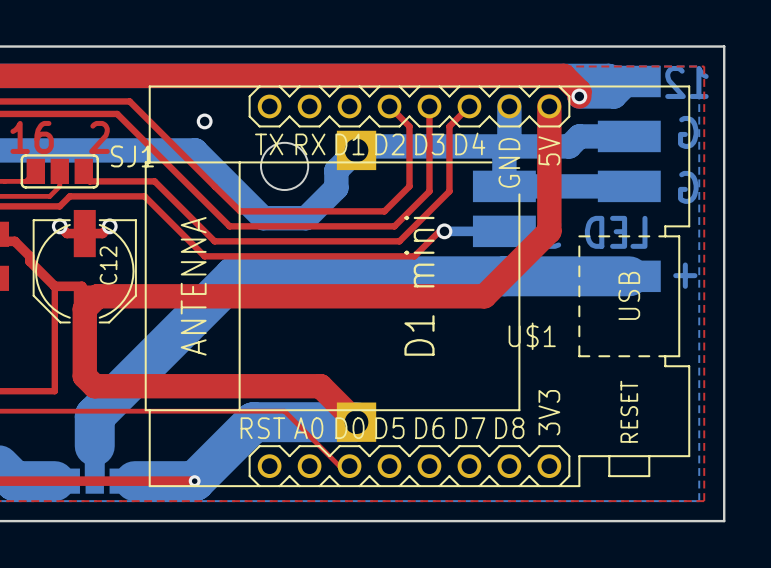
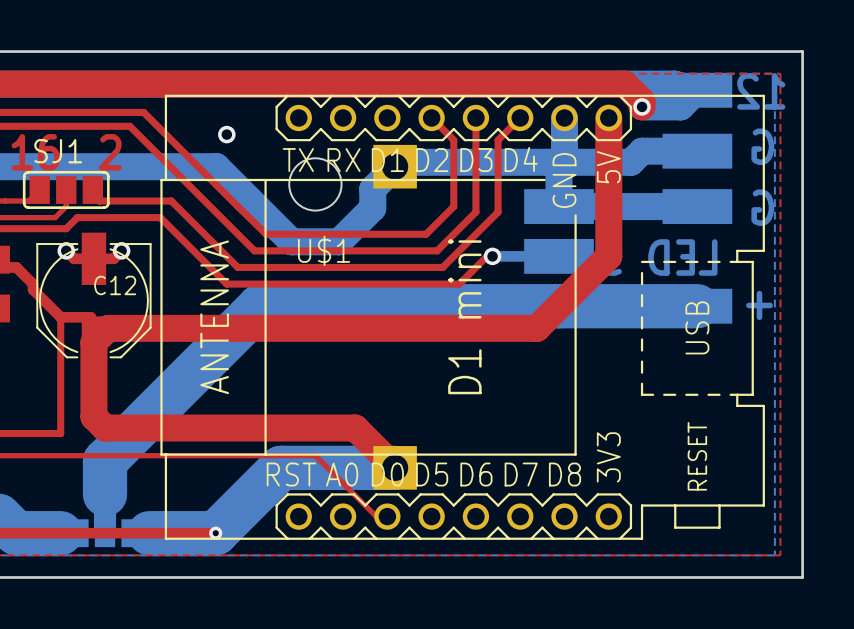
SJ1 name position: SJ1 (132, 156) -> SJ1 (58, 151)
C12 name rotation: 0° (108, 265) -> 90° clockwise (115, 285)
U$1 name position: U$1 (532, 336) -> U$1 (324, 250)

